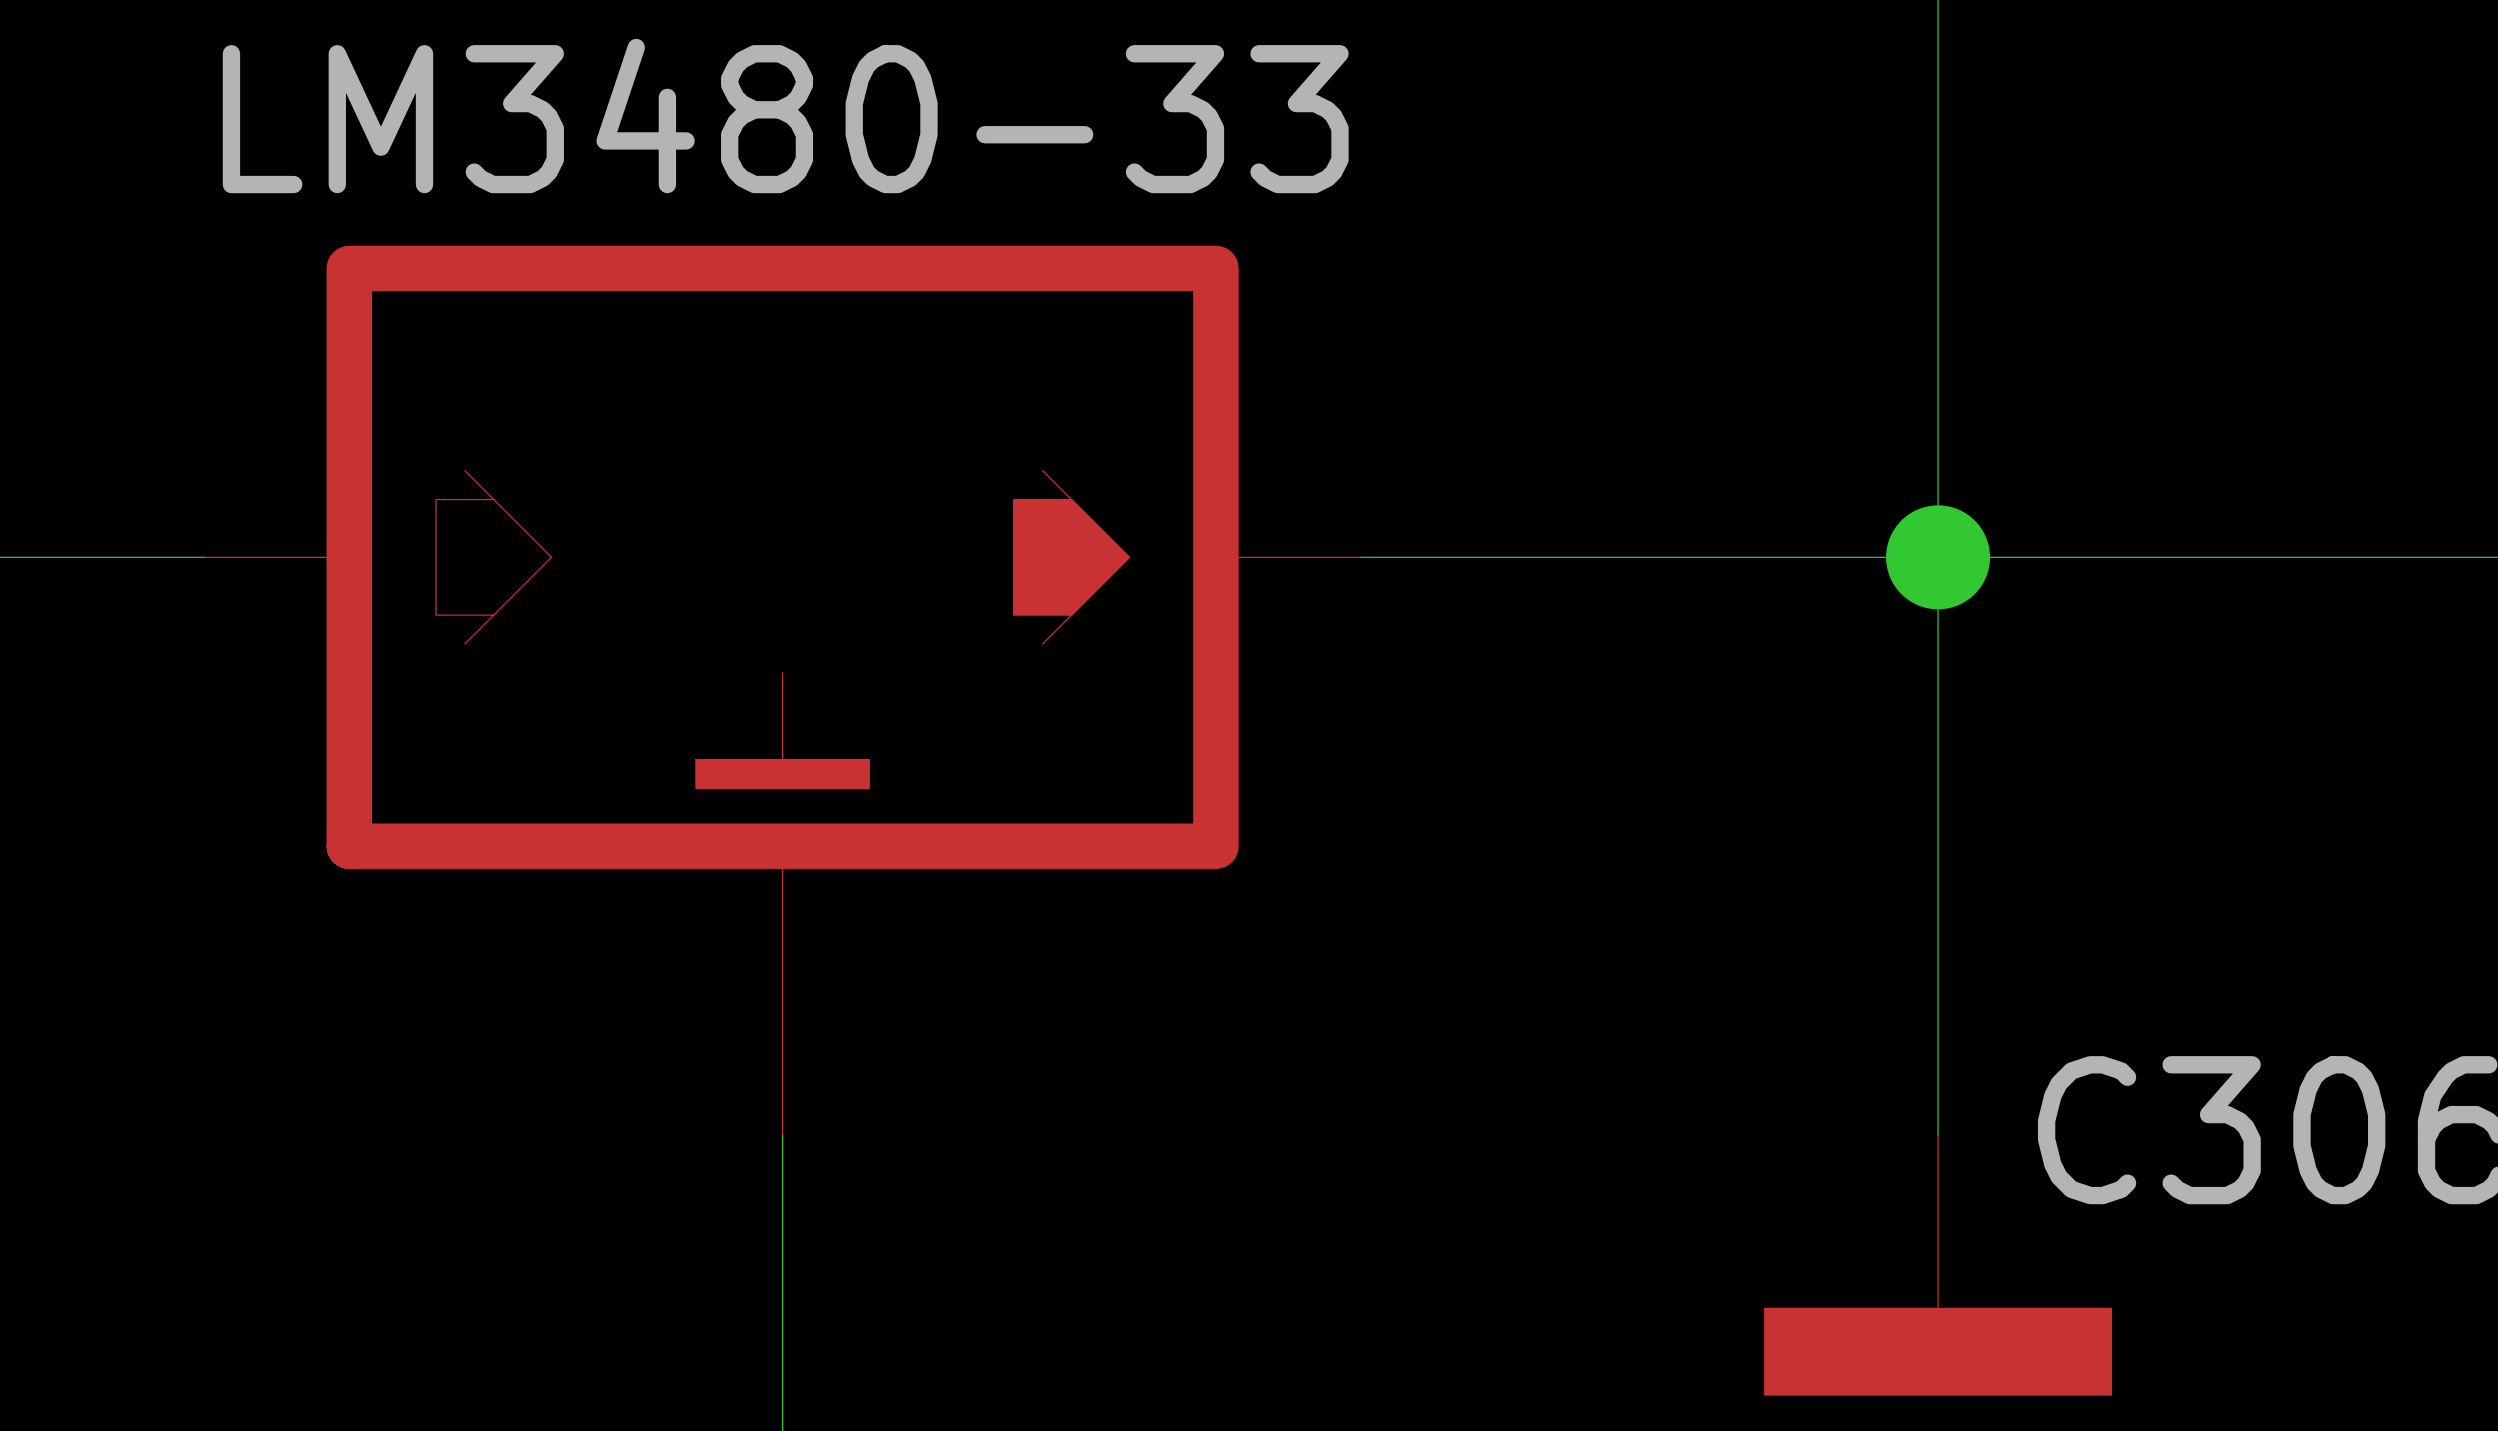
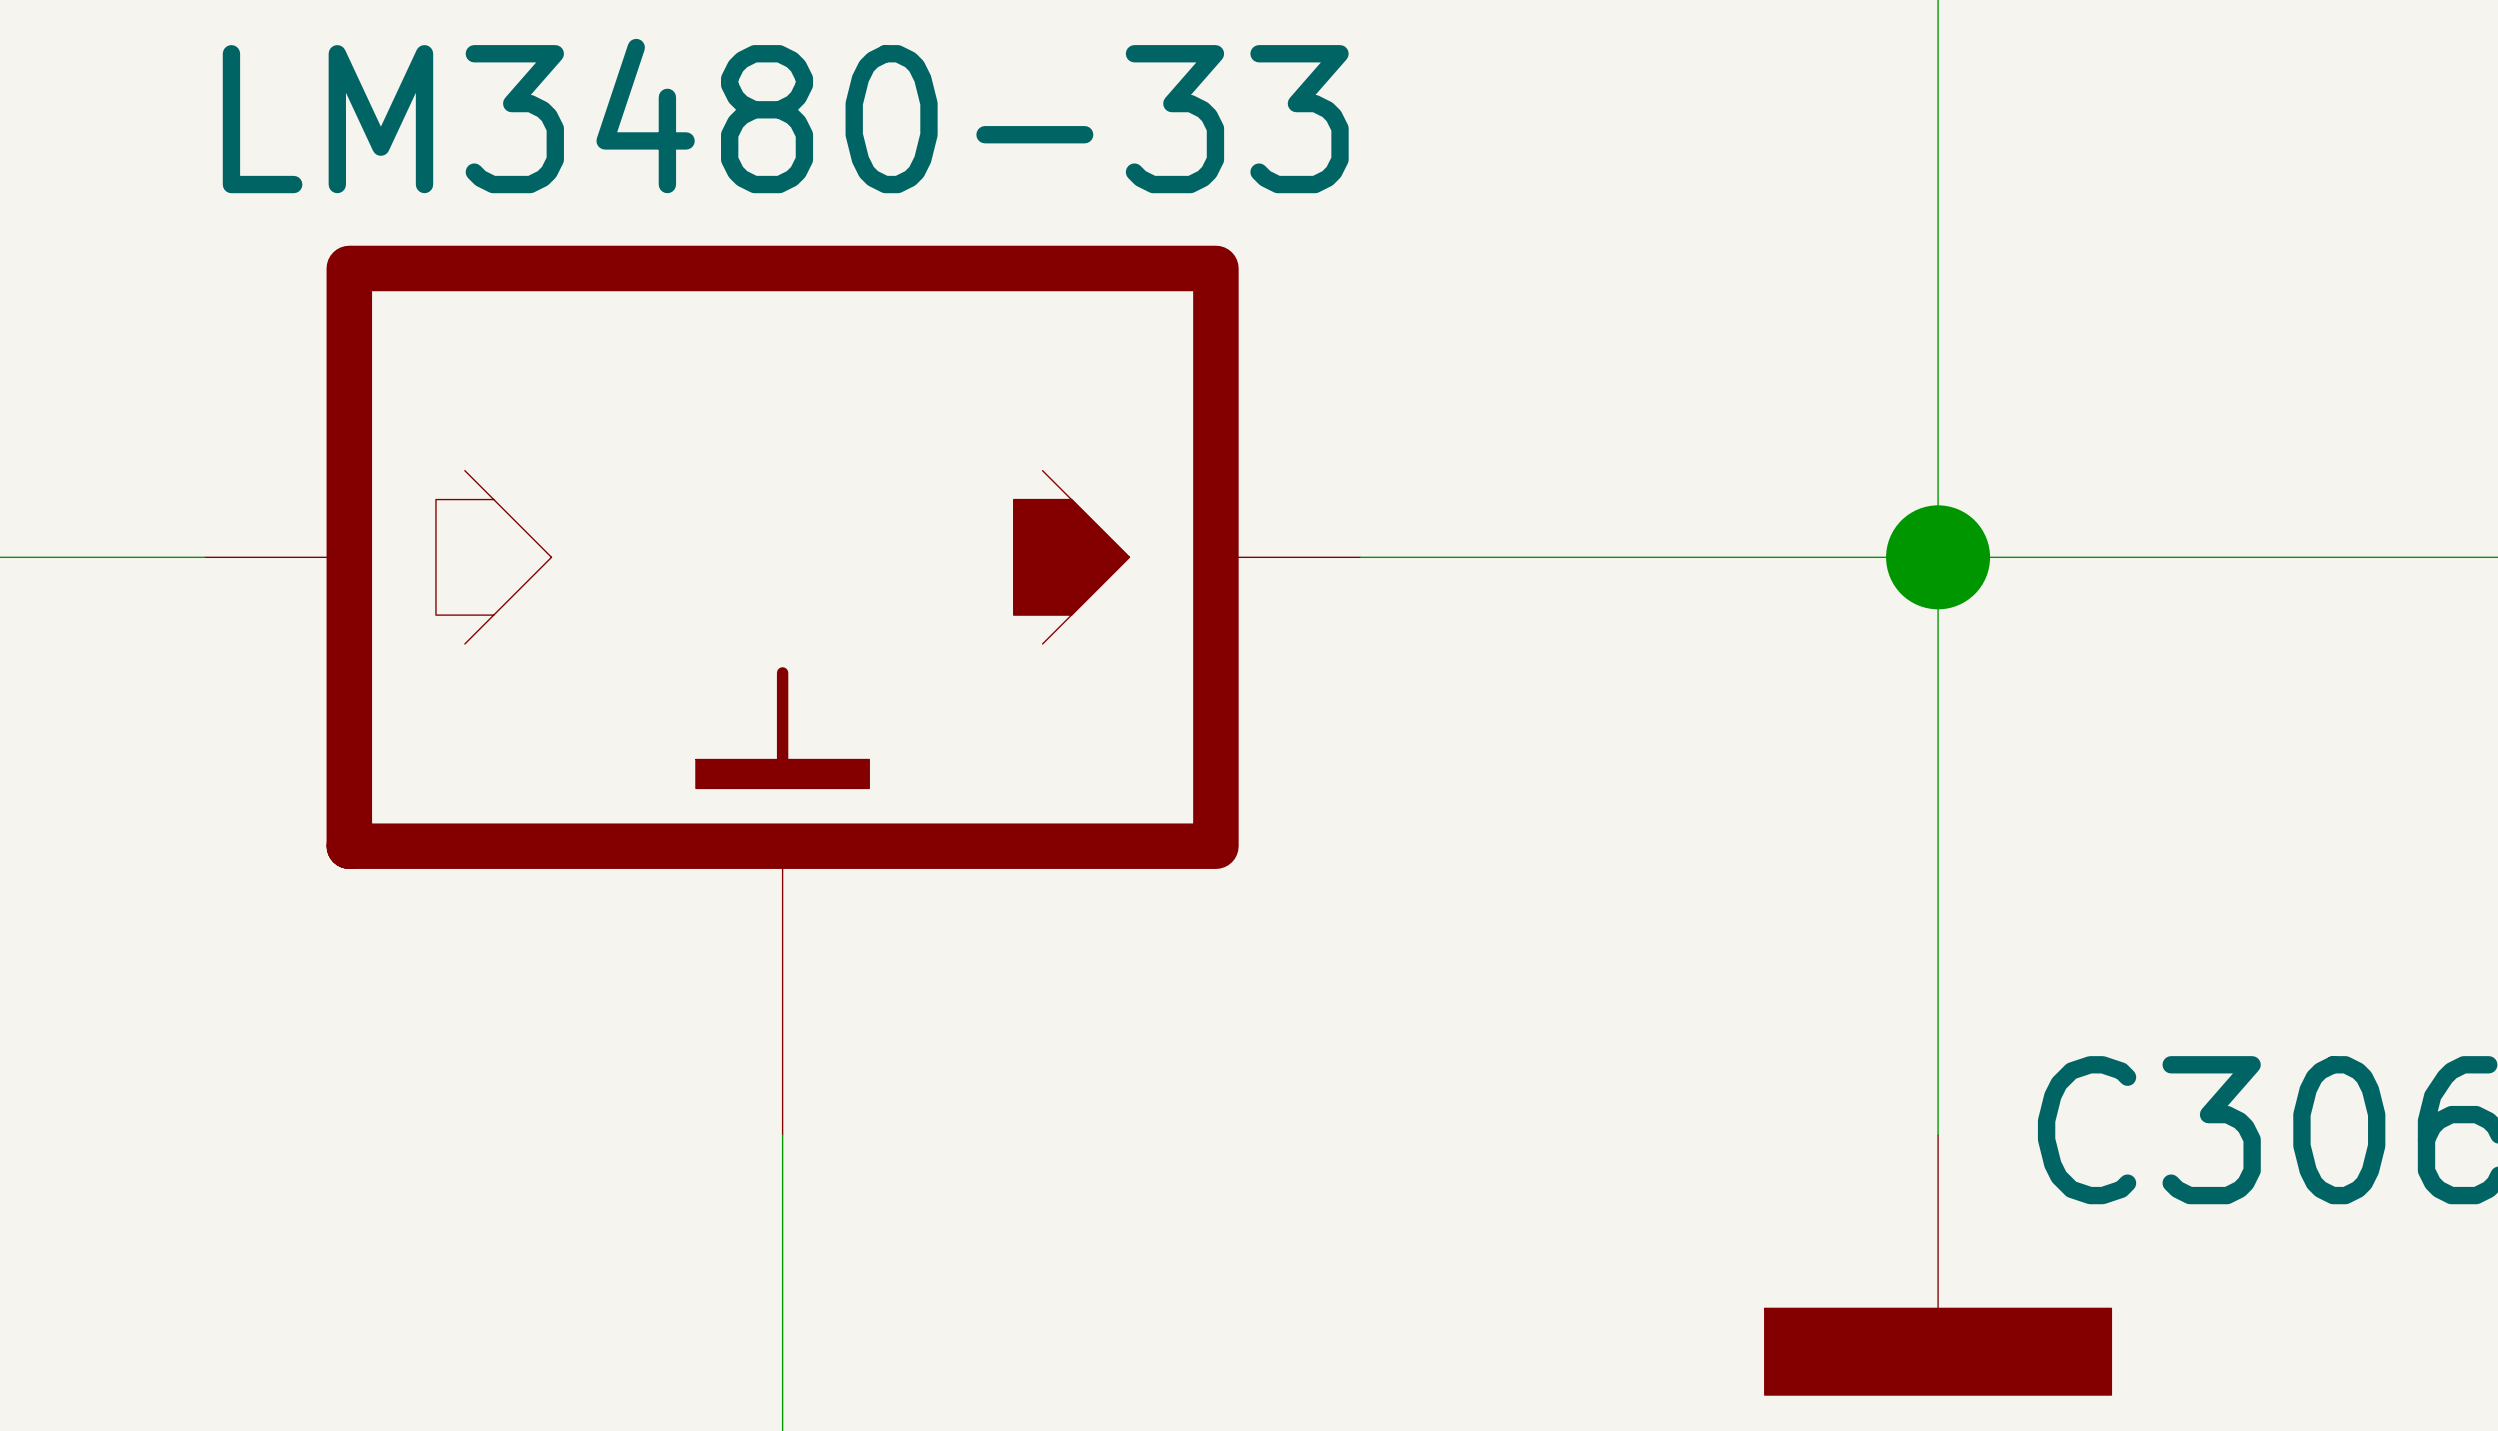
part symbol: [204, 245, 1361, 1136] -> [204, 245, 1361, 1136]

